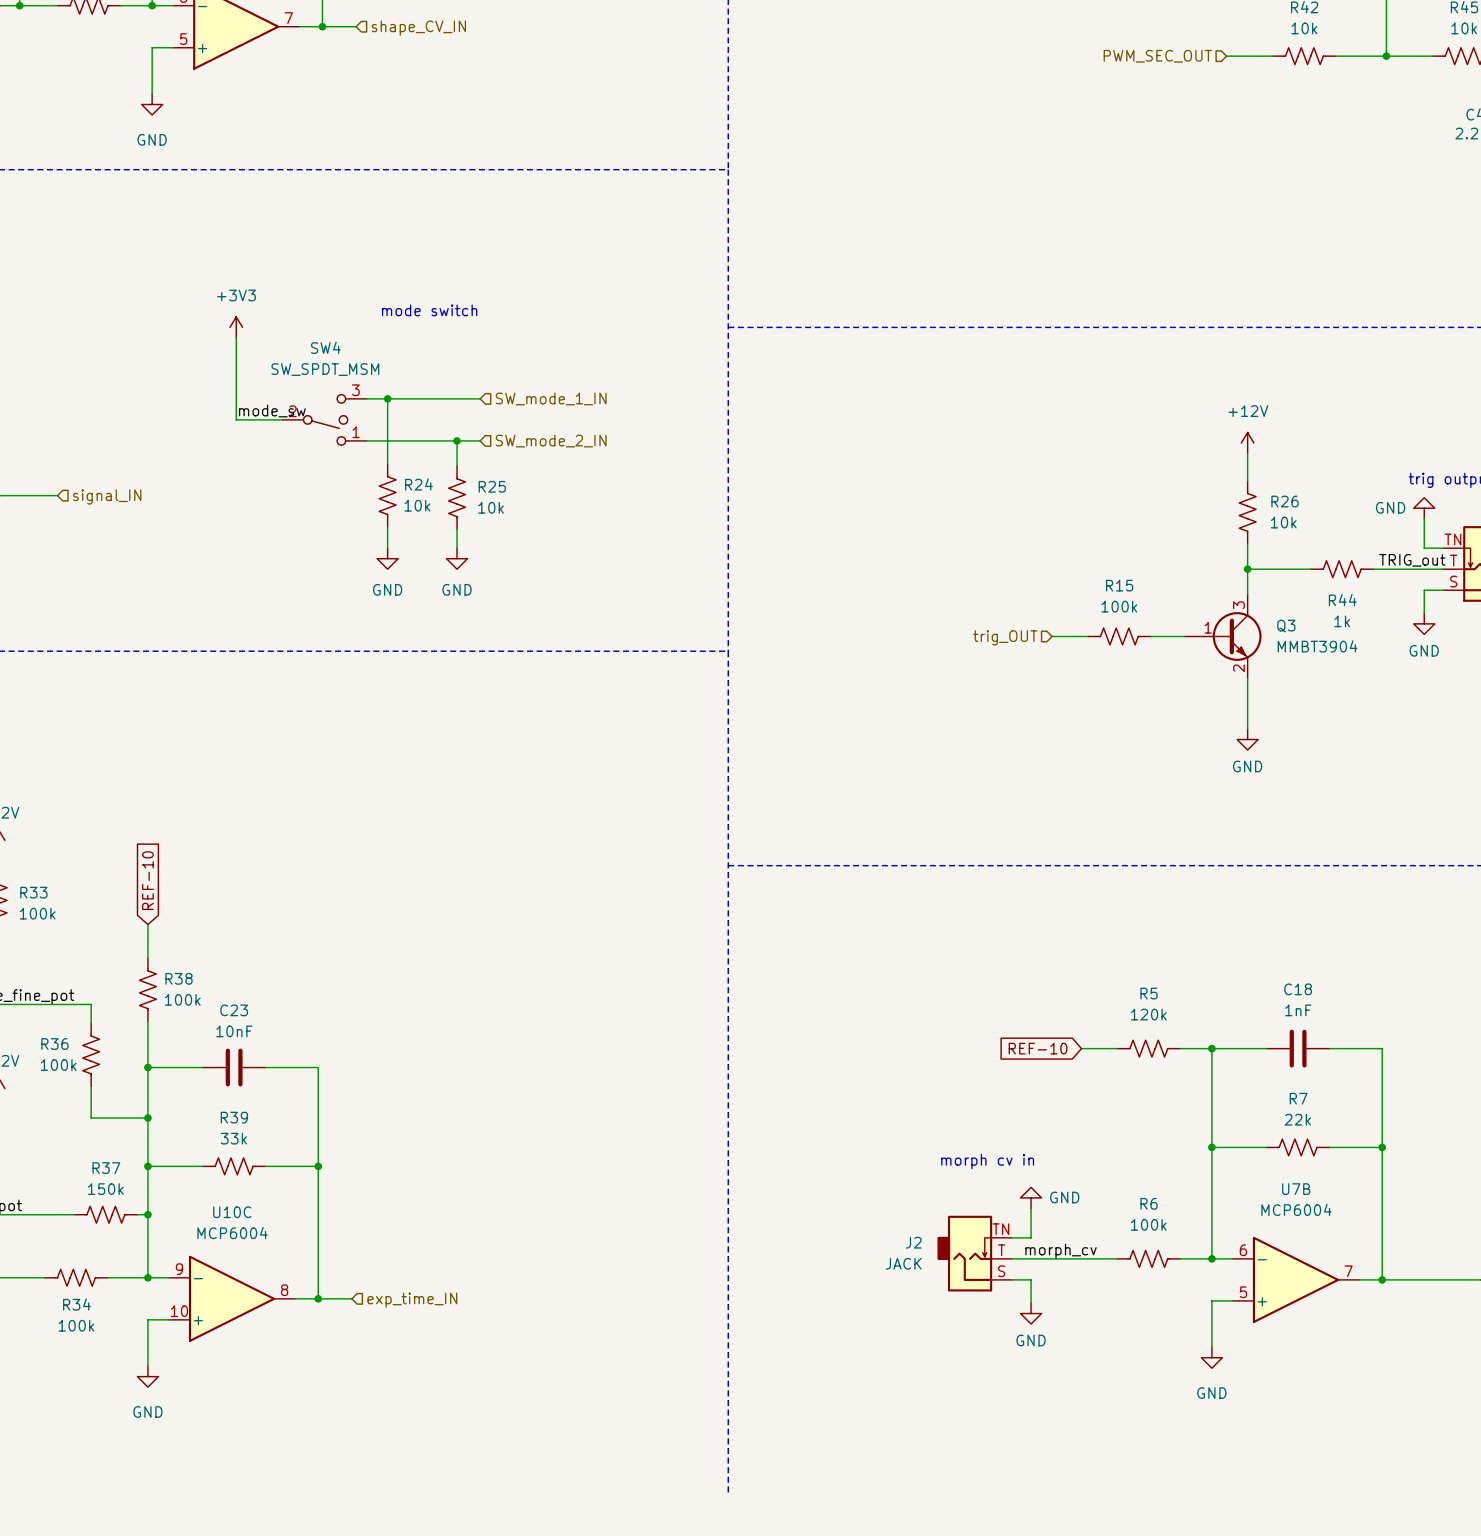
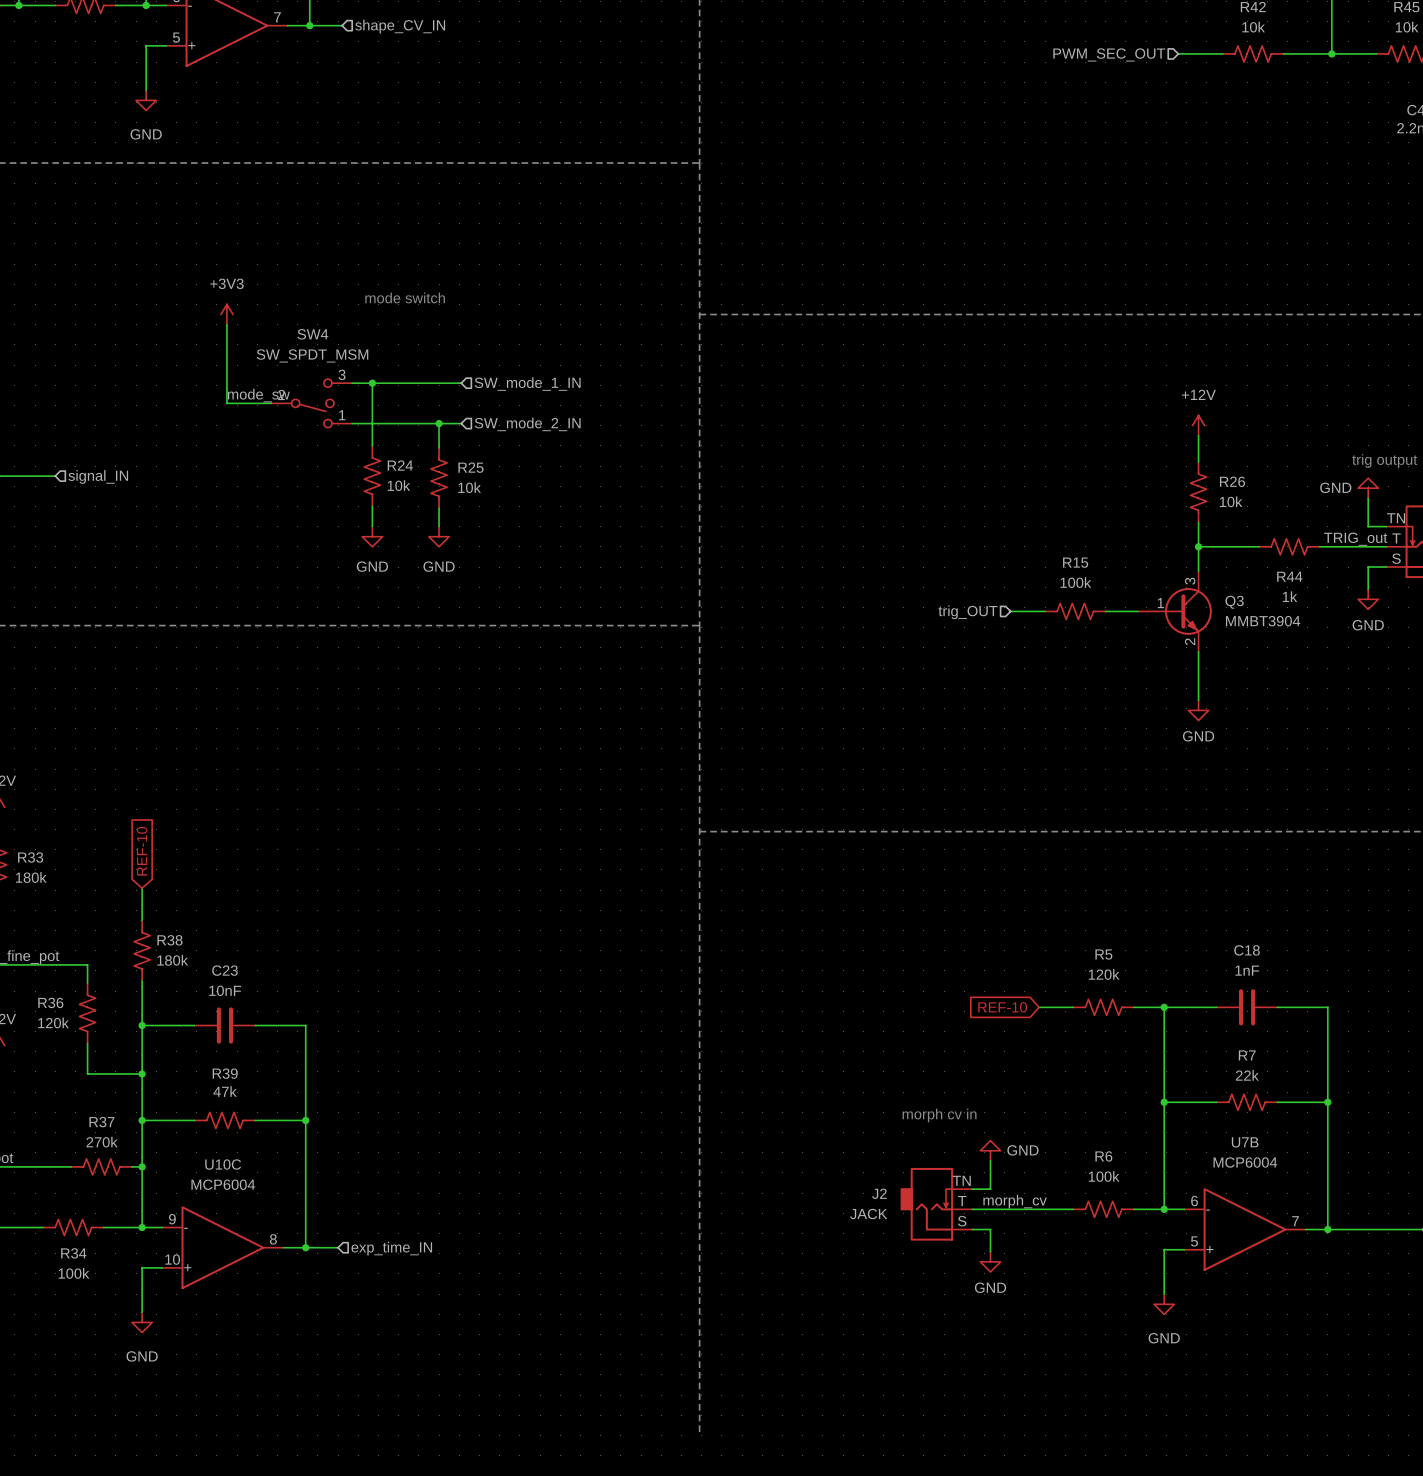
R33 value: 100k (37, 913) -> 180k (31, 877)
R38 value: 100k (182, 999) -> 180k (172, 960)
R36 value: 100k (58, 1065) -> 120k (53, 1022)
R39 value: 33k (233, 1138) -> 47k (225, 1091)
R37 value: 150k (105, 1189) -> 270k (102, 1142)

